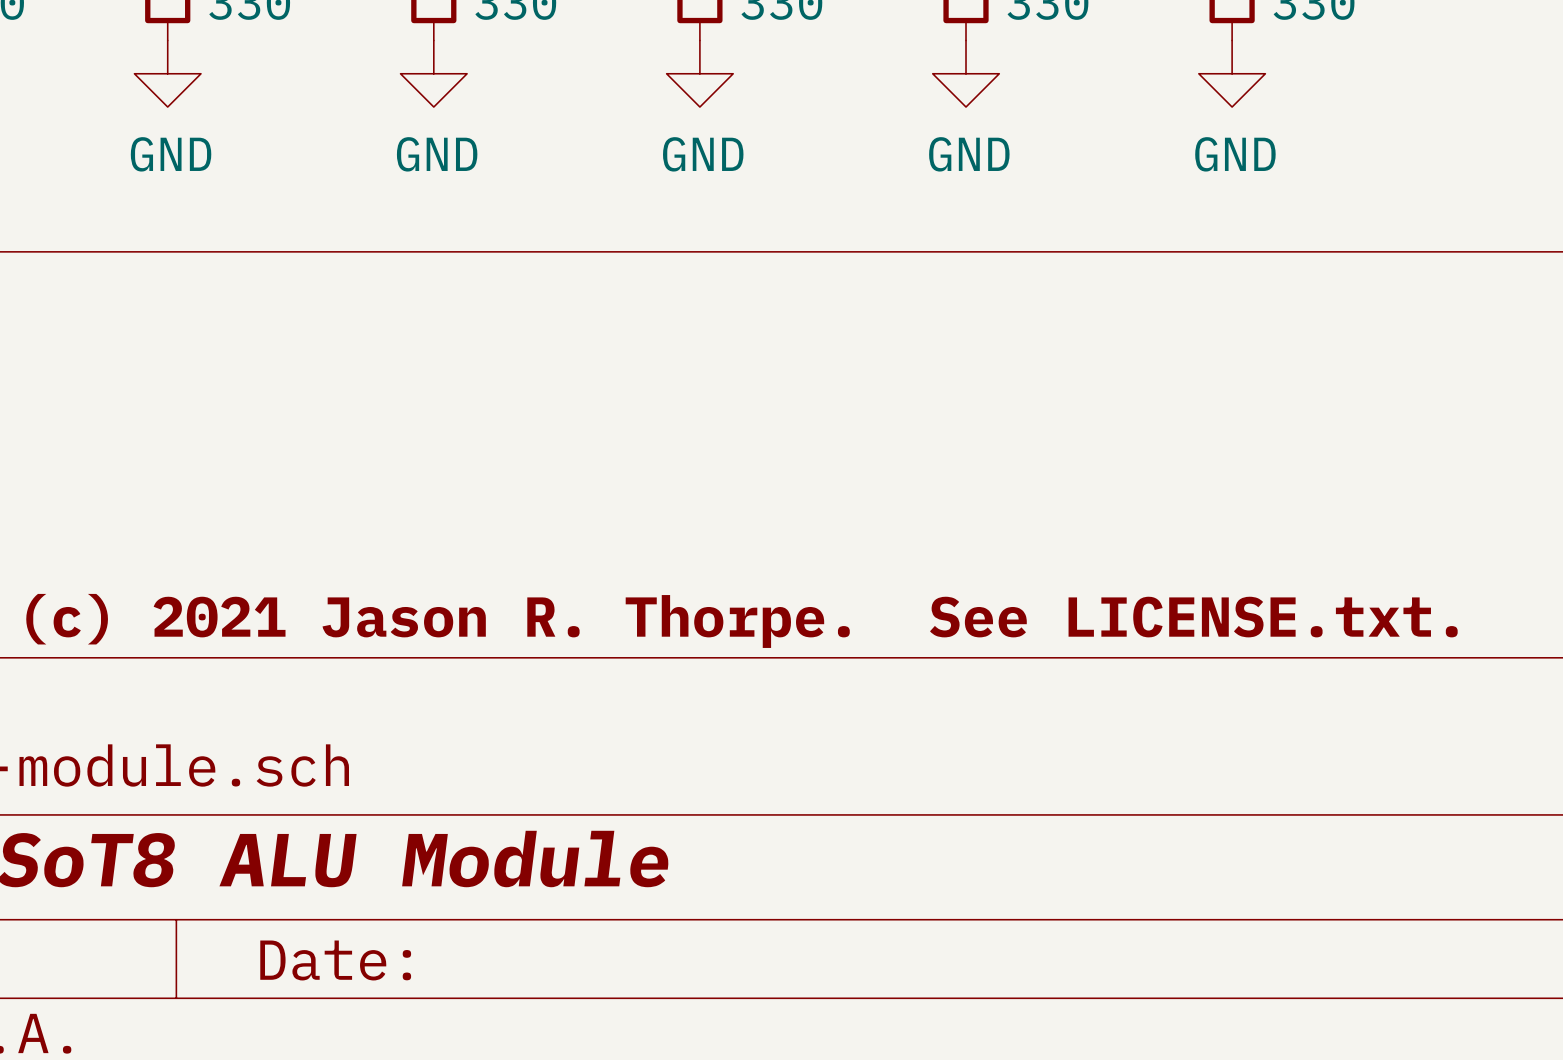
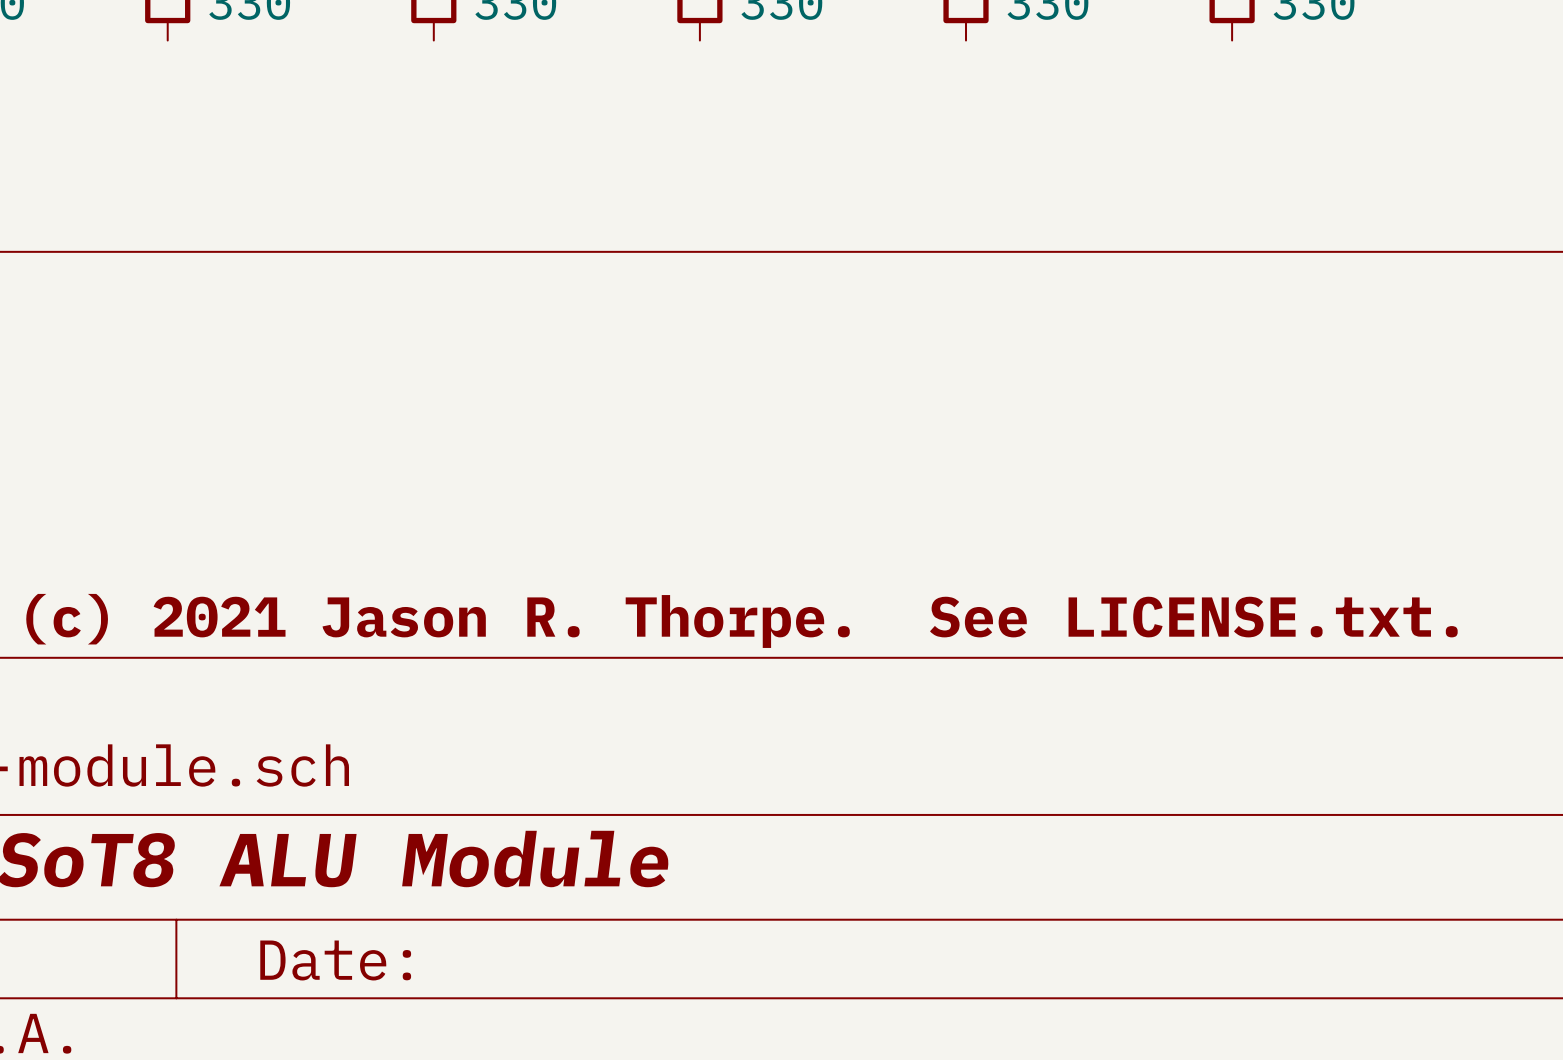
power symbol: GND (167, 73) -> none
power symbol: GND (433, 73) -> none
power symbol: GND (699, 73) -> none
power symbol: GND (966, 73) -> none
power symbol: GND (1232, 73) -> none

